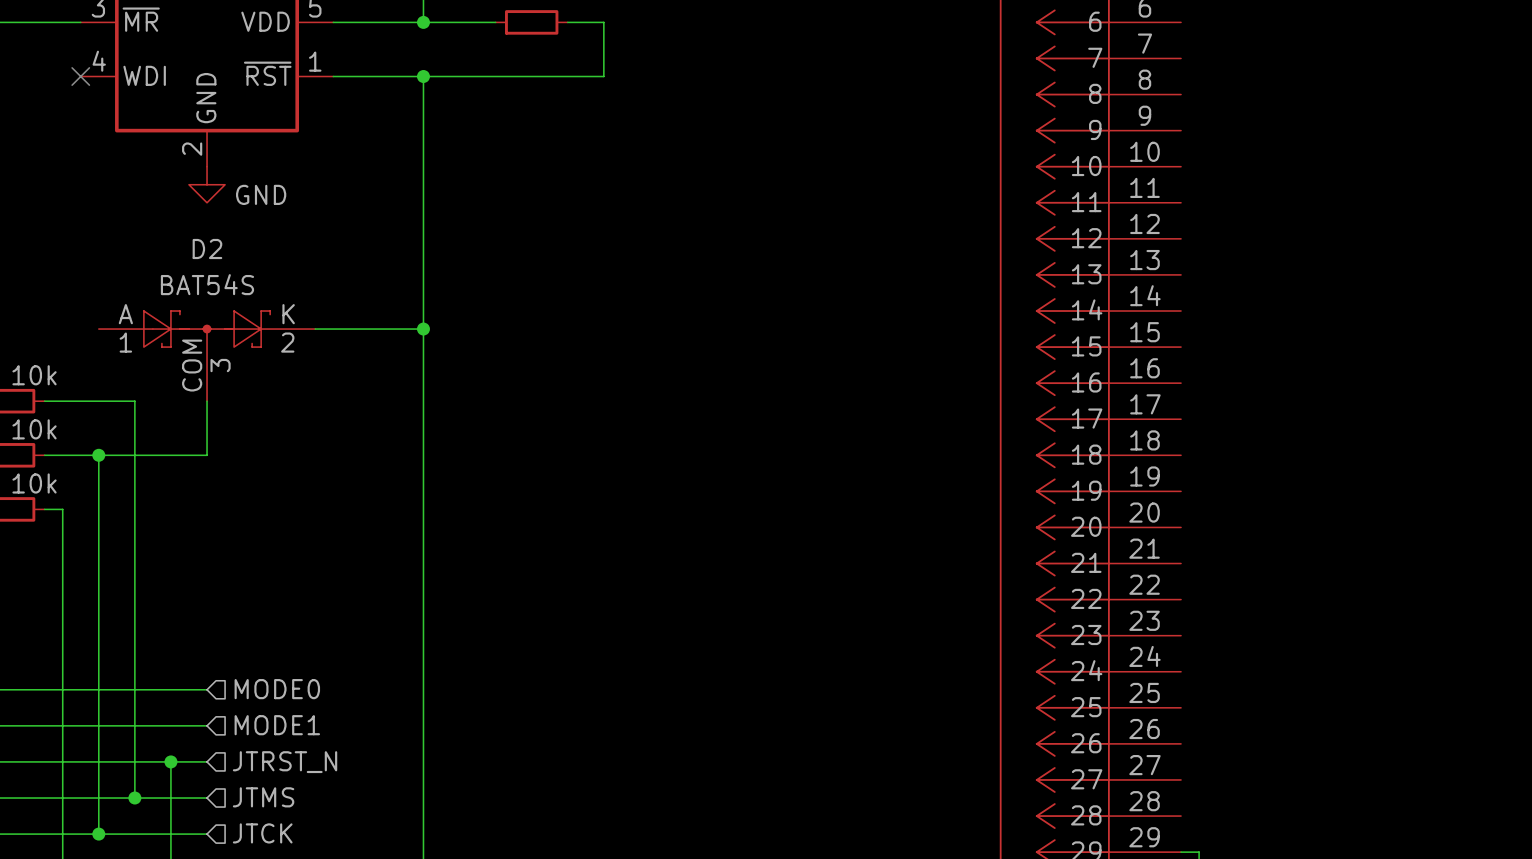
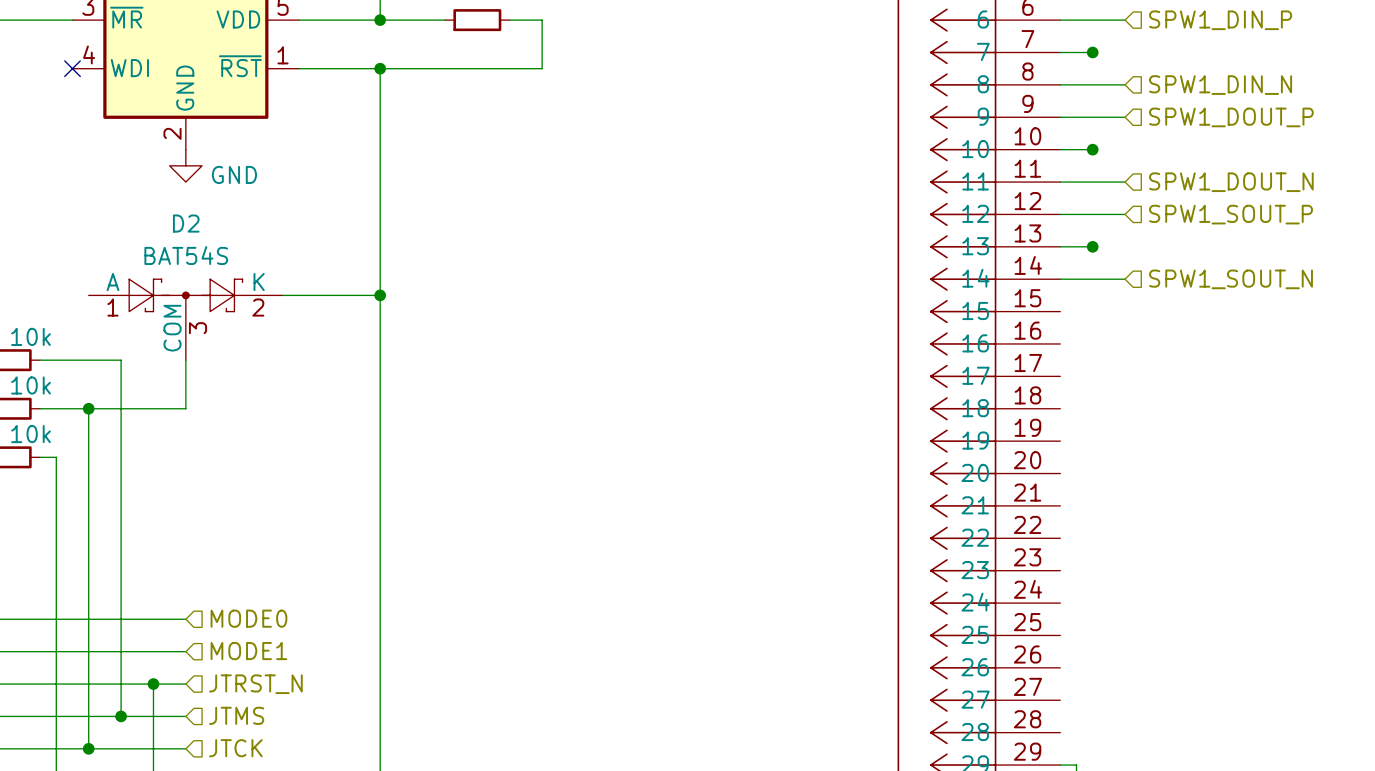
wire: none -> (1060, 20) (1125, 20)
hierarchical label: none -> SPW1_DIN_P (1220, 20)
wire: none -> (1060, 52) (1092, 52)
junction: none -> (1092, 52)
wire: none -> (1060, 84) (1125, 84)
hierarchical label: none -> SPW1_DIN_N (1220, 85)
wire: none -> (1060, 117) (1125, 117)
hierarchical label: none -> SPW1_DOUT_P (1231, 117)
wire: none -> (1060, 149) (1092, 149)
junction: none -> (1092, 149)
wire: none -> (1060, 182) (1125, 182)
hierarchical label: none -> SPW1_DOUT_N (1231, 182)
wire: none -> (1060, 214) (1125, 214)
hierarchical label: none -> SPW1_SOUT_P (1230, 214)
wire: none -> (1060, 246) (1092, 246)
junction: none -> (1092, 246)
wire: none -> (1060, 279) (1125, 279)
hierarchical label: none -> SPW1_SOUT_N (1230, 279)

